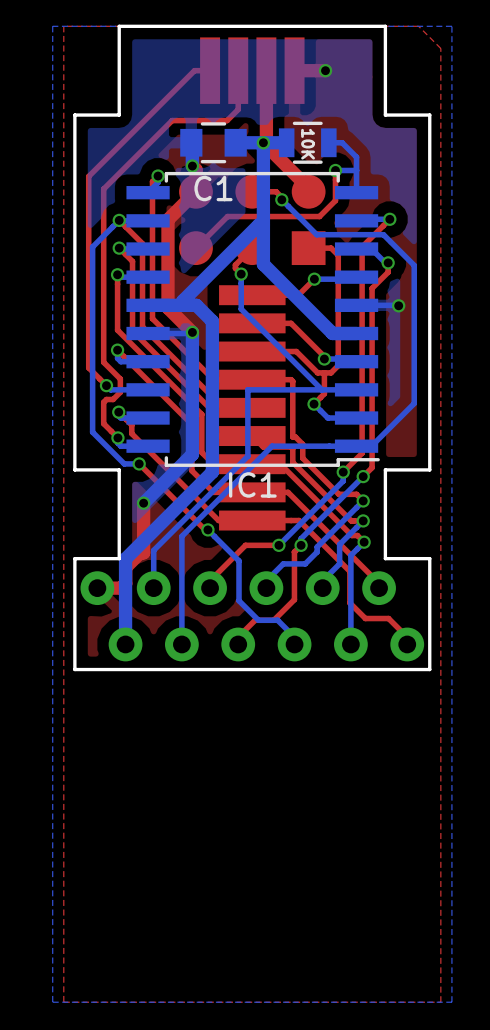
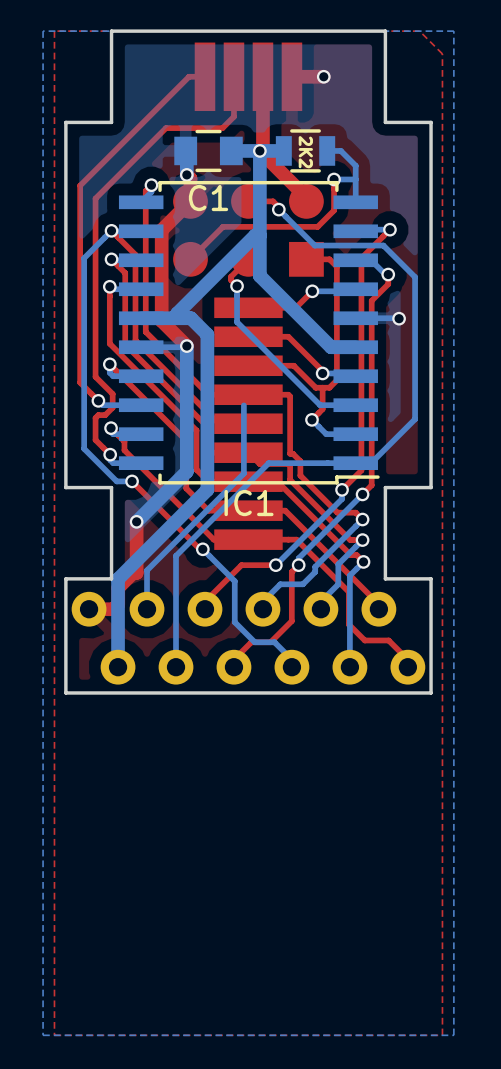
part value: 10K (308, 144) -> 2K2 (305, 152)
bottom track: (321, 389) (248, 389) -> none

